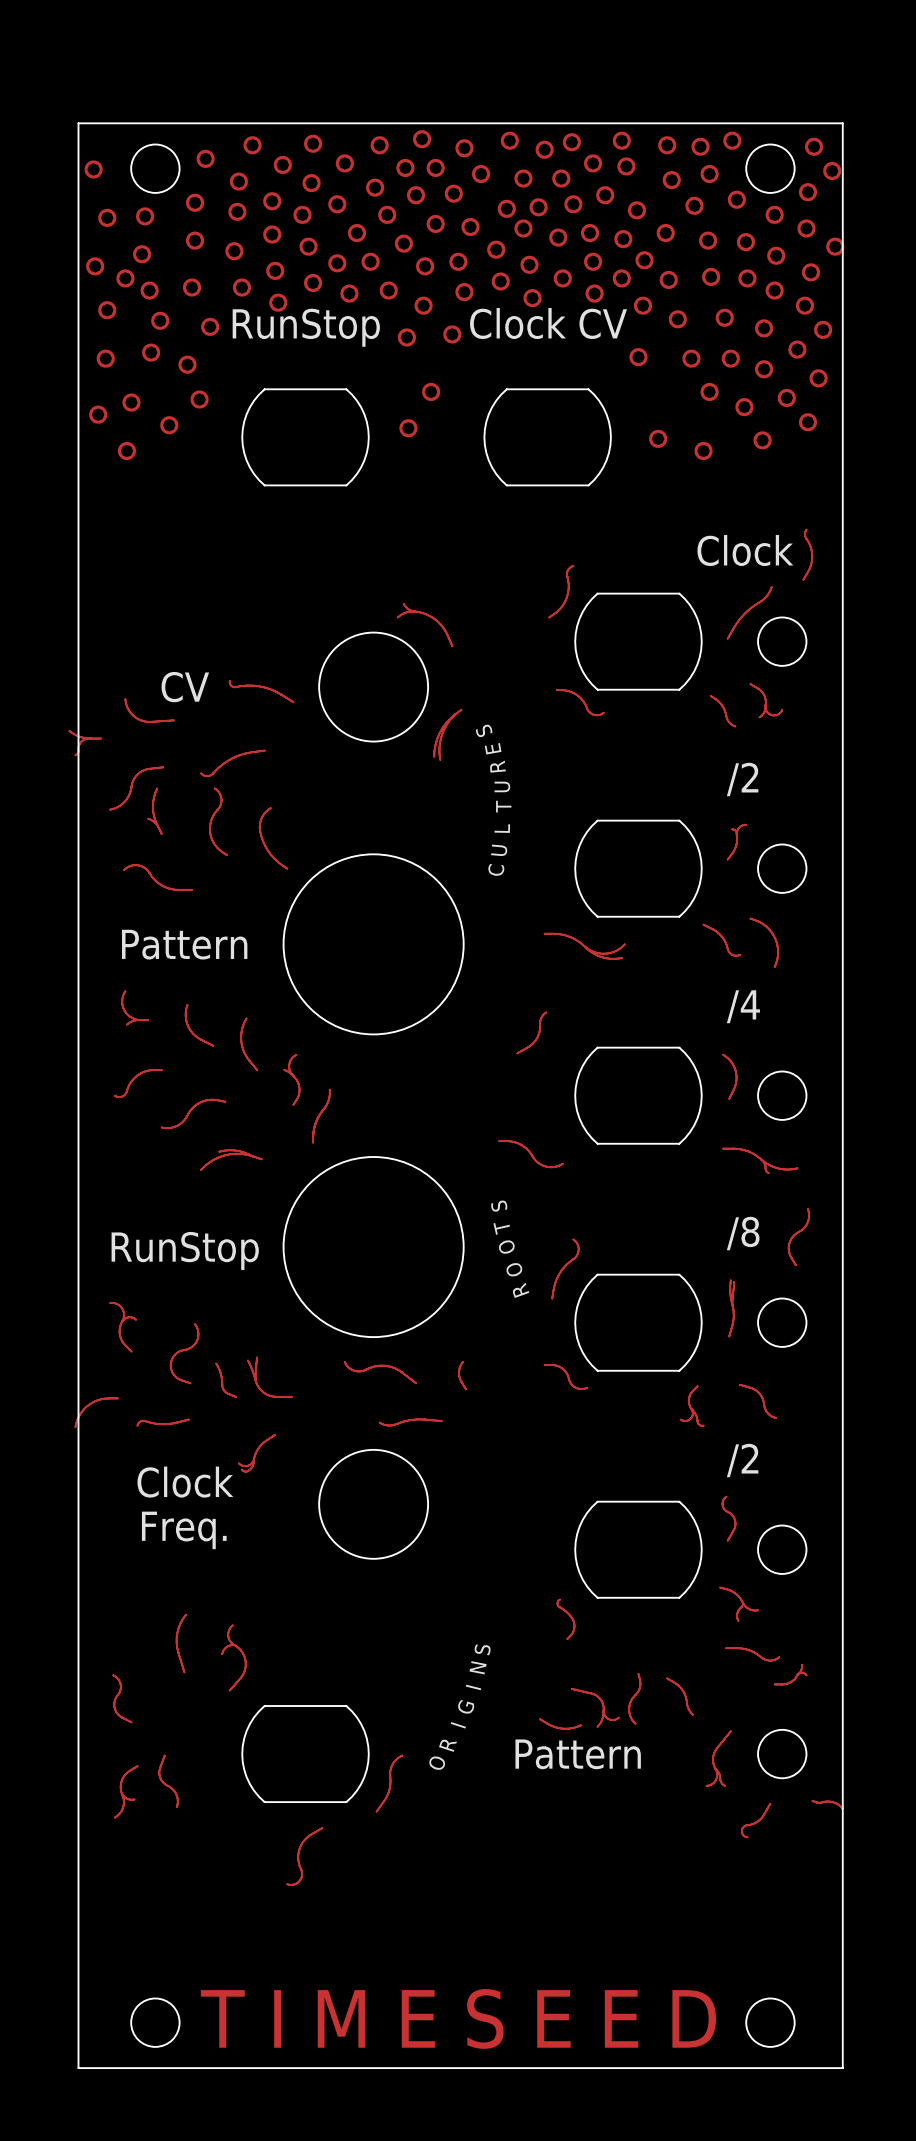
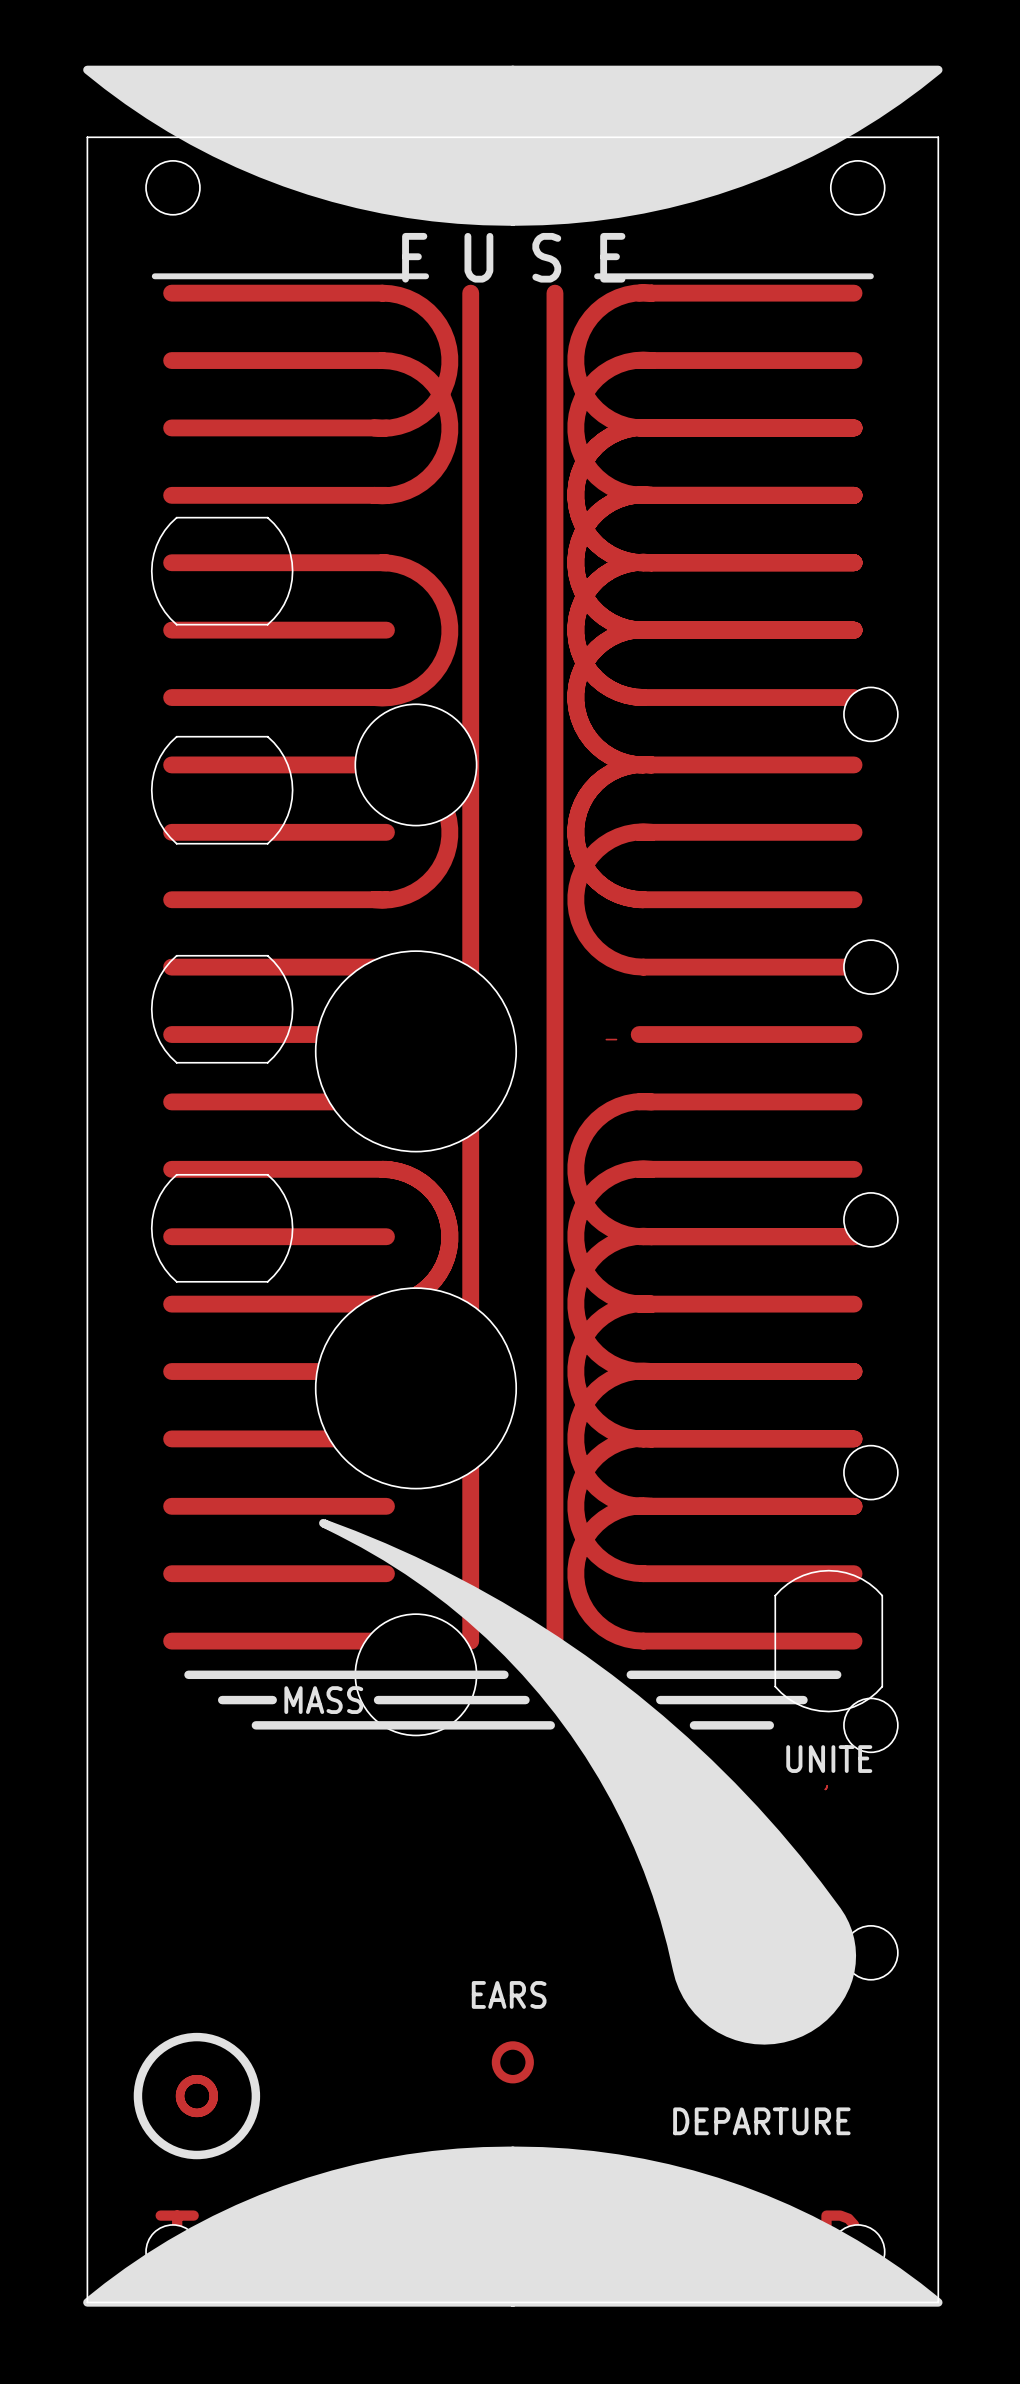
drawing: none -> [83, 65, 943, 226]
drawing: [196, 130, 746, 347] -> none
drawing: [682, 137, 845, 450] -> none
drawing: [84, 160, 103, 179] -> none
drawing: [185, 193, 205, 212] -> none
drawing: [136, 207, 155, 226] -> none
drawing: [98, 208, 117, 227] -> none
drawing: [185, 231, 205, 250] -> none
text: none -> F U S E (513, 257)
drawing: [225, 242, 244, 261] -> none
drawing: [86, 245, 170, 362] -> none
line: none -> (154, 276) (426, 276)
line: none -> (597, 276) (870, 276)
track: none -> (171, 293) (382, 293) (407, 297) (422, 306) (434, 317) (446, 339) (449, 365) (446, 381) (434, 403) (414, 420) (399, 426) (373, 427)
track: none -> (470, 293) (470, 1641)
track: none -> (554, 293) (554, 1641)
track: none -> (639, 293) (854, 293)
track: none -> (651, 293) (634, 293) (618, 297) (597, 310) (582, 331) (575, 356) (579, 381) (591, 403) (603, 415) (618, 423) (643, 427)
drawing: [182, 278, 202, 297] -> none
drawing: [715, 308, 734, 327] -> none
drawing: [201, 317, 220, 336] -> none
track: none -> (171, 360) (382, 360) (407, 365) (422, 373) (434, 385) (446, 407) (449, 432) (446, 449) (434, 471) (414, 487) (399, 493) (373, 495)
text: Clock CV (548, 323) -> none
track: none -> (639, 360) (854, 360)
track: none -> (651, 360) (634, 360) (618, 364) (597, 378) (582, 398) (575, 423) (579, 448) (591, 470) (603, 482) (618, 490) (643, 495)
text: RunStop (306, 327) -> none
drawing: [629, 348, 648, 367] -> none
drawing: [96, 349, 115, 368] -> none
drawing: [160, 355, 209, 435] -> none
drawing: [422, 382, 441, 402] -> none
track: none -> (171, 427) (386, 427)
track: none -> (639, 427) (854, 427)
track: none -> (651, 427) (634, 427) (618, 432) (597, 445) (582, 466) (575, 490) (579, 516) (591, 538) (610, 554) (634, 562) (643, 562) (634, 562) (626, 560) (618, 557) (610, 554) (603, 549) (591, 538) (582, 523) (579, 516) (576, 507) (575, 490) (579, 474) (582, 466) (586, 458) (597, 445) (603, 440) (618, 432) (626, 429) (634, 427) (643, 427) (651, 427)
drawing: [484, 389, 611, 486] -> none
drawing: [89, 393, 141, 424] -> none
drawing: [399, 419, 418, 438] -> none
drawing: [649, 429, 668, 448] -> none
drawing position: (305, 437) -> (222, 571)
drawing: [117, 441, 137, 461] -> none
drawing: [694, 441, 713, 461] -> none
track: none -> (171, 495) (386, 495)
track: none -> (639, 495) (854, 495)
track: none -> (651, 495) (634, 495) (618, 499) (597, 513) (582, 533) (575, 558) (579, 583) (591, 605) (610, 621) (634, 629) (643, 630) (634, 629) (626, 628) (618, 625) (610, 621) (603, 617) (591, 605) (582, 591) (579, 583) (576, 575) (575, 558) (579, 541) (582, 533) (586, 526) (597, 513) (603, 507) (618, 499) (626, 496) (634, 495) (643, 494) (651, 495)
track: none -> (171, 562) (386, 562)
track: none -> (382, 562) (407, 567) (422, 575) (434, 587) (446, 609) (449, 634) (443, 659) (428, 679) (407, 693) (390, 697) (373, 697)
track: none -> (639, 562) (854, 562)
track: none -> (651, 562) (634, 562) (618, 566) (597, 580) (582, 601) (575, 625) (579, 650) (591, 673) (610, 689) (634, 697) (643, 697) (634, 697) (626, 695) (618, 692) (610, 689) (603, 684) (591, 673) (582, 658) (579, 650) (576, 642) (575, 625) (579, 608) (582, 601) (586, 593) (597, 580) (603, 575) (618, 566) (626, 564) (634, 562) (643, 562) (651, 562)
track: (806, 538) (812, 555) (807, 572) -> none
track: (806, 538) (804, 534) (806, 529) (805, 532) (804, 534) (805, 536) (806, 538) -> none
track: (806, 538) (812, 555) (807, 572) -> none
text: Clock (745, 550) -> none
track: none -> (171, 630) (386, 630)
track: none -> (639, 630) (854, 630)
track: none -> (651, 630) (634, 630) (618, 634) (597, 647) (582, 668) (575, 693) (579, 718) (591, 740) (610, 756) (634, 764) (643, 764) (634, 764) (626, 762) (618, 760) (610, 756) (603, 752) (591, 740) (582, 726) (579, 718) (576, 709) (575, 693) (579, 676) (582, 668) (586, 661) (597, 647) (603, 642) (618, 634) (626, 631) (634, 630) (643, 629) (651, 630)
track: (807, 572) (803, 579) -> none
track: (567, 576) (568, 585) (566, 597) (562, 605) (553, 614) -> none
track: (567, 576) (568, 569) (573, 566) (570, 567) (568, 569) (567, 572) (567, 576) -> none
track: (567, 576) (568, 585) (566, 597) (562, 605) (553, 614) -> none
drawing: [575, 593, 702, 690] -> none
track: (759, 602) (744, 613) (733, 628) -> none
track: (759, 602) (767, 595) (771, 587) (768, 593) (767, 595) (762, 600) (759, 602) -> none
track: (759, 602) (744, 613) (733, 628) -> none
track: (412, 611) (404, 612) (397, 617) (399, 615) (404, 612) (410, 611) (412, 611) -> none
track: (414, 611) (434, 618) (447, 635) -> none
track: (414, 611) (408, 609) (403, 603) (405, 606) (408, 609) (410, 610) (414, 611) -> none
track: (414, 611) (434, 618) (447, 635) -> none
track: (553, 614) (549, 617) -> none
track: none -> (171, 697) (386, 697)
track: none -> (639, 697) (854, 697)
track: (733, 628) (727, 638) -> none
track: (447, 635) (452, 646) -> none
drawing: none -> [151, 736, 293, 844]
track: none -> (171, 764) (386, 764)
text: CV (185, 687) -> none
track: (235, 687) (259, 686) (281, 694) -> none
track: (235, 687) (231, 685) (229, 681) (229, 683) (231, 685) (233, 687) (235, 687) -> none
track: (235, 687) (259, 686) (281, 694) -> none
track: none -> (382, 764) (407, 769) (422, 777) (434, 789) (446, 811) (449, 836) (443, 861) (428, 881) (407, 895) (390, 899) (373, 899)
track: none -> (639, 764) (854, 764)
track: none -> (651, 764) (634, 764) (618, 769) (597, 782) (582, 803) (575, 827) (579, 852) (591, 875) (610, 891) (634, 899) (643, 899) (634, 899) (626, 897) (618, 894) (610, 891) (603, 886) (591, 875) (582, 860) (579, 852) (576, 844) (575, 827) (579, 811) (582, 803) (586, 795) (597, 782) (603, 777) (618, 769) (626, 766) (634, 764) (643, 764) (651, 764)
track: (281, 694) (293, 702) -> none
track: (711, 696) (715, 699) -> none
track: (715, 699) (722, 706) (726, 715) -> none
track: (715, 699) (722, 706) (726, 715) -> none
track: (765, 705) (764, 695) (758, 688) (761, 690) (764, 695) (765, 701) (765, 705) -> none
track: (765, 705) (766, 711) (771, 715) (778, 714) (782, 709) (780, 712) (778, 714) (775, 715) (771, 715) (768, 713) (766, 711) (765, 708) (765, 705) -> none
track: (765, 706) (763, 712) (759, 717) (762, 715) (763, 712) (765, 709) (765, 706) -> none
track: (587, 708) (577, 695) (561, 690) (571, 691) (577, 695) (581, 699) (587, 708) -> none
track: (587, 708) (594, 714) (603, 712) (599, 715) (594, 714) (589, 712) (587, 708) -> none
track: (461, 709) (455, 714) -> none
track: (455, 714) (439, 733) (434, 756) (435, 744) (439, 733) (446, 722) (455, 714) -> none
track: (453, 715) (441, 736) (440, 759) (439, 747) (441, 736) (446, 725) (453, 715) -> none
track: (726, 715) (729, 722) (735, 726) (732, 725) (729, 722) (727, 718) (726, 715) -> none
track: (173, 720) (151, 721) -> none
track: (151, 721) (140, 720) (133, 715) (127, 707) (125, 699) (126, 704) (127, 707) (129, 711) (133, 715) (135, 717) (140, 720) (145, 721) (151, 721) -> none
track: (69, 730) (79, 736) (90, 738) (83, 737) (79, 736) (72, 733) (69, 730) -> none
text: S (484, 730) -> none
track: (89, 738) (101, 738) -> none
track: (89, 738) (81, 742) (78, 750) -> none
track: (89, 738) (81, 742) (78, 750) -> none
track: none -> (171, 832) (386, 832)
track: none -> (639, 832) (854, 832)
track: none -> (651, 832) (626, 833) (610, 840) (591, 856) (579, 878) (575, 895) (579, 920) (591, 942) (603, 954) (618, 962) (643, 967) (854, 967)
text: E (493, 748) -> none
track: (78, 750) (77, 753) (75, 755) (76, 754) (77, 753) (78, 752) (78, 750) -> none
text: R (497, 766) -> none
track: (163, 767) (149, 768) -> none
track: (149, 768) (137, 774) (131, 786) -> none
track: (149, 768) (137, 774) (131, 786) -> none
track: (213, 773) (230, 759) (252, 752) (245, 753) (230, 759) (224, 763) (213, 773) -> none
track: (213, 773) (207, 776) (201, 773) (204, 775) (207, 776) (210, 775) (213, 773) -> none
text: /2 (742, 779) -> none
track: (131, 786) (124, 801) (110, 809) (116, 807) (124, 801) (128, 796) (131, 786) -> none
text: U (502, 786) -> none
text: T (503, 806) -> none
track: none -> (171, 899) (386, 899)
track: none -> (639, 899) (854, 899)
track: (217, 809) (212, 818) (210, 831) (214, 844) (222, 852) -> none
track: (217, 809) (221, 798) (214, 788) (219, 793) (221, 798) (221, 803) (217, 809) -> none
track: (217, 809) (212, 818) (210, 831) (214, 844) (222, 852) -> none
drawing: [575, 820, 702, 917] -> none
track: (155, 823) (152, 820) (148, 818) (150, 819) (152, 820) (154, 821) (155, 823) -> none
track: (157, 824) (161, 833) -> none
track: (157, 824) (152, 806) (157, 788) (153, 797) (152, 806) (153, 815) (157, 824) -> none
text: L (502, 828) -> none
track: (260, 830) (267, 850) (282, 865) (274, 858) (267, 850) (263, 841) (260, 830) -> none
track: (260, 830) (261, 817) (270, 808) (266, 811) (261, 817) (259, 825) (260, 830) -> none
track: (736, 833) (735, 830) (732, 829) (734, 829) (735, 830) (736, 832) (736, 833) -> none
track: (736, 835) (736, 844) (732, 853) -> none
track: (736, 835) (738, 828) (745, 824) (742, 825) (738, 828) (737, 830) (736, 835) -> none
track: (736, 835) (736, 844) (732, 853) -> none
text: U (499, 850) -> none
track: (222, 852) (226, 855) -> none
track: (732, 853) (727, 859) -> none
drawing: none -> [151, 955, 293, 1063]
track: none -> (171, 967) (382, 967) (407, 971) (422, 980) (439, 998) (446, 1013) (449, 1039) (443, 1063) (428, 1084) (414, 1094) (399, 1100) (373, 1101)
text: C (496, 870) -> none
track: (149, 873) (161, 885) (178, 889) -> none
track: (149, 873) (144, 867) (137, 865) (130, 866) (123, 870) (126, 867) (130, 866) (133, 865) (137, 865) (141, 866) (144, 867) (147, 870) (149, 873) -> none
track: (149, 873) (161, 885) (178, 889) -> none
track: (178, 889) (192, 889) -> none
track: (750, 918) (755, 920) -> none
track: (755, 920) (768, 928) (775, 939) (777, 955) (774, 967) (776, 963) (777, 955) (777, 947) (775, 939) (773, 935) (768, 928) (762, 923) (755, 920) -> none
track: none -> (171, 1034) (386, 1034)
track: none -> (639, 1034) (854, 1034)
text: Pattern (184, 944) -> none
track: (583, 945) (570, 936) (553, 933) (564, 935) (570, 936) (579, 942) (583, 945) -> none
track: (583, 945) (595, 952) (604, 953) (614, 951) (624, 944) (619, 948) (614, 951) (607, 953) (604, 953) (601, 953) (595, 952) (589, 949) (583, 945) -> none
track: (585, 947) (602, 957) (621, 957) (612, 958) (602, 957) (593, 953) (585, 947) -> none
track: (727, 948) (722, 937) (712, 929) (718, 932) (722, 937) (725, 942) (727, 948) -> none
track: (727, 948) (732, 954) (739, 954) (736, 955) (732, 954) (729, 951) (727, 948) -> none
track: none -> (171, 1101) (386, 1101)
track: none -> (639, 1101) (854, 1101)
track: none -> (651, 1101) (634, 1101) (618, 1106) (597, 1119) (582, 1140) (575, 1164) (579, 1189) (591, 1212) (610, 1228) (626, 1234) (643, 1236)
track: (125, 991) (122, 999) (124, 1010) (132, 1017) (140, 1020) (136, 1019) (132, 1017) (126, 1013) (124, 1010) (122, 1003) (122, 999) (123, 995) (125, 991) -> none
text: /4 (743, 1006) -> none
track: (139, 1020) (148, 1020) -> none
track: (139, 1020) (132, 1021) (126, 1024) (130, 1022) (132, 1021) (136, 1020) (139, 1020) -> none
track: (540, 1024) (537, 1037) (527, 1047) -> none
track: (540, 1024) (541, 1017) (546, 1012) (543, 1014) (541, 1017) (540, 1021) (540, 1024) -> none
track: (540, 1024) (537, 1037) (527, 1047) -> none
track: (201, 1039) (213, 1045) -> none
track: (201, 1039) (192, 1033) (187, 1024) (185, 1014) (187, 1004) (186, 1008) (185, 1014) (185, 1018) (187, 1024) (189, 1028) (192, 1033) (195, 1035) (201, 1039) -> none
track: (527, 1047) (517, 1053) -> none
drawing: [575, 1047, 702, 1144] -> none
track: none -> (171, 1169) (386, 1169)
track: none -> (382, 1169) (399, 1171) (414, 1177) (434, 1193) (446, 1216) (449, 1241) (443, 1265) (428, 1286) (407, 1299) (382, 1304) (373, 1304) (382, 1304) (390, 1304) (407, 1299) (414, 1296) (428, 1286) (439, 1273) (443, 1265) (446, 1257) (449, 1241) (449, 1232) (446, 1216) (439, 1200) (434, 1193) (422, 1182) (414, 1177) (407, 1174) (399, 1171) (390, 1169) (382, 1169)
track: none -> (639, 1169) (854, 1169)
track: none -> (651, 1169) (634, 1169) (618, 1173) (597, 1187) (582, 1207) (575, 1232) (579, 1257) (591, 1279) (610, 1295) (626, 1301) (643, 1304)
drawing: none -> [151, 1174, 293, 1282]
track: (249, 1060) (257, 1069) -> none
track: (249, 1060) (242, 1049) (241, 1040) (242, 1026) (246, 1018) (244, 1022) (242, 1026) (241, 1035) (241, 1040) (241, 1044) (242, 1049) (244, 1053) (249, 1060) -> none
track: (154, 1069) (161, 1069) -> none
track: (154, 1069) (145, 1071) (136, 1075) (130, 1082) (126, 1091) -> none
track: (154, 1069) (145, 1071) (136, 1075) (130, 1082) (126, 1091) -> none
track: (291, 1074) (288, 1071) (284, 1069) (286, 1070) (288, 1071) (290, 1073) (291, 1074) -> none
track: (293, 1076) (299, 1087) (296, 1100) -> none
track: (293, 1076) (289, 1070) (289, 1064) (291, 1058) (296, 1054) (293, 1056) (291, 1058) (290, 1061) (289, 1064) (289, 1067) (289, 1070) (291, 1073) (293, 1076) -> none
track: (293, 1076) (299, 1087) (296, 1100) -> none
track: (733, 1089) (729, 1098) -> none
track: (733, 1089) (736, 1080) (735, 1070) (730, 1061) (723, 1054) (728, 1058) (730, 1061) (734, 1067) (735, 1070) (736, 1073) (736, 1080) (735, 1086) (733, 1089) -> none
track: (126, 1091) (122, 1096) (114, 1095) (118, 1097) (122, 1096) (125, 1094) (126, 1091) -> none
track: (217, 1100) (225, 1101) -> none
track: (217, 1100) (200, 1102) (187, 1115) -> none
track: (217, 1100) (200, 1102) (187, 1115) -> none
track: (296, 1100) (293, 1104) -> none
track: (323, 1109) (315, 1122) (313, 1138) -> none
track: (323, 1109) (315, 1122) (313, 1138) -> none
track: (323, 1109) (328, 1100) (329, 1089) (329, 1094) (328, 1100) (326, 1104) (323, 1109) -> none
track: (323, 1109) (315, 1122) (313, 1138) -> none
track: none -> (171, 1236) (386, 1236)
track: none -> (639, 1236) (854, 1236)
track: none -> (651, 1236) (634, 1236) (618, 1240) (597, 1254) (582, 1275) (575, 1299) (579, 1324) (591, 1346) (610, 1363) (626, 1369) (643, 1371)
track: (187, 1115) (176, 1126) (161, 1127) (169, 1128) (176, 1126) (183, 1121) (187, 1115) -> none
track: (313, 1138) (313, 1142) -> none
track: (499, 1141) (506, 1141) -> none
track: (506, 1141) (521, 1145) (532, 1156) (528, 1151) (521, 1145) (516, 1142) (506, 1141) -> none
track: (723, 1148) (733, 1148) -> none
track: (733, 1148) (748, 1151) (761, 1159) -> none
track: (733, 1148) (748, 1151) (761, 1159) -> none
track: (249, 1154) (234, 1150) (219, 1151) (229, 1150) (234, 1150) (239, 1151) (249, 1154) -> none
track: (252, 1156) (261, 1159) -> none
track: (252, 1156) (235, 1153) (224, 1155) (209, 1162) (201, 1169) (205, 1165) (209, 1162) (219, 1157) (224, 1155) (230, 1154) (235, 1153) (247, 1154) (252, 1156) -> none
track: (761, 1159) (778, 1168) (797, 1168) (787, 1169) (778, 1168) (769, 1164) (761, 1159) -> none
track: (762, 1160) (764, 1164) (765, 1168) (765, 1166) (764, 1164) (763, 1162) (762, 1160) -> none
track: none -> (171, 1304) (386, 1304)
track: none -> (639, 1304) (854, 1304)
track: none -> (651, 1304) (634, 1304) (618, 1308) (597, 1321) (582, 1342) (575, 1367) (579, 1392) (591, 1414) (610, 1430) (626, 1436) (643, 1438)
text: S (499, 1206) -> none
text: T (501, 1228) -> none
track: none -> (171, 1371) (386, 1371)
track: none -> (639, 1371) (854, 1371)
track: none -> (651, 1371) (634, 1371) (618, 1375) (597, 1389) (582, 1409) (575, 1434) (579, 1459) (591, 1481) (610, 1497) (626, 1504) (643, 1506)
track: (798, 1231) (793, 1235) (789, 1243) (789, 1251) (791, 1257) -> none
track: (798, 1231) (807, 1222) (807, 1209) (809, 1215) (807, 1222) (804, 1227) (798, 1231) -> none
track: (798, 1231) (793, 1235) (789, 1243) (789, 1251) (791, 1257) -> none
text: /8 (743, 1233) -> none
text: O (506, 1247) -> none
text: RunStop (185, 1250) -> none
track: (791, 1257) (795, 1265) -> none
track: (573, 1259) (560, 1272) (553, 1289) (556, 1280) (560, 1272) (566, 1265) (573, 1259) -> none
track: (573, 1259) (578, 1249) (573, 1239) (577, 1243) (578, 1249) (577, 1254) (573, 1259) -> none
text: O (514, 1269) -> none
drawing: [575, 1274, 702, 1371] -> none
track: (733, 1287) (732, 1303) -> none
track: (733, 1287) (734, 1284) (733, 1281) (734, 1283) (734, 1284) (734, 1286) (733, 1287) -> none
track: (733, 1287) (732, 1303) -> none
text: R (520, 1290) -> none
track: none -> (171, 1438) (386, 1438)
track: none -> (639, 1438) (854, 1438)
track: none -> (651, 1438) (626, 1440) (610, 1446) (597, 1456) (582, 1477) (575, 1501) (579, 1526) (586, 1542) (603, 1560) (626, 1571) (643, 1573) (854, 1573)
track: (732, 1304) (732, 1325) -> none
track: (732, 1304) (730, 1292) (730, 1280) (730, 1286) (730, 1292) (730, 1298) (732, 1304) -> none
track: (732, 1304) (732, 1325) -> none
track: (123, 1319) (129, 1317) (136, 1319) (133, 1317) (129, 1317) (126, 1317) (123, 1319) -> none
track: (122, 1321) (119, 1333) (125, 1345) -> none
track: (122, 1321) (124, 1315) (122, 1308) (117, 1304) (110, 1303) (113, 1303) (117, 1304) (120, 1306) (122, 1308) (123, 1312) (124, 1315) (123, 1318) (122, 1321) -> none
track: (122, 1321) (119, 1333) (125, 1345) -> none
track: (732, 1325) (729, 1336) -> none
track: (125, 1345) (131, 1351) -> none
track: (184, 1349) (175, 1353) (170, 1363) (172, 1373) (181, 1380) -> none
track: (184, 1349) (191, 1347) (197, 1340) (198, 1332) (195, 1324) (197, 1329) (198, 1332) (198, 1336) (197, 1340) (194, 1344) (191, 1347) (188, 1349) (184, 1349) -> none
track: (184, 1349) (175, 1353) (170, 1363) (172, 1373) (181, 1380) -> none
track: none -> (171, 1506) (386, 1506)
track: none -> (639, 1506) (854, 1506)
track: none -> (651, 1506) (626, 1507) (610, 1514) (597, 1524) (582, 1544) (575, 1569) (579, 1594) (586, 1609) (603, 1628) (626, 1638) (643, 1641) (854, 1641)
drawing: none -> [319, 1518, 883, 2084]
track: (544, 1365) (552, 1365) -> none
track: (552, 1365) (562, 1368) (568, 1378) -> none
track: (552, 1365) (562, 1368) (568, 1378) -> none
track: (366, 1369) (384, 1365) (402, 1372) -> none
track: (366, 1369) (353, 1370) (344, 1362) (349, 1367) (353, 1370) (360, 1371) (366, 1369) -> none
track: (366, 1369) (384, 1365) (402, 1372) -> none
track: (402, 1372) (415, 1383) -> none
track: (255, 1378) (255, 1368) (257, 1357) (255, 1368) (255, 1378) -> none
track: (568, 1378) (575, 1387) (587, 1387) (580, 1389) (575, 1387) (571, 1384) (568, 1378) -> none
track: (181, 1380) (190, 1383) -> none
track: (255, 1380) (263, 1392) (276, 1396) -> none
track: (255, 1380) (252, 1370) (248, 1360) (250, 1365) (252, 1370) (254, 1375) (255, 1380) -> none
track: (255, 1380) (263, 1392) (276, 1396) -> none
track: (461, 1381) (465, 1389) -> none
track: (461, 1381) (459, 1371) (462, 1362) (460, 1365) (459, 1371) (459, 1375) (461, 1381) -> none
track: (222, 1384) (223, 1390) (228, 1393) -> none
track: (222, 1384) (220, 1373) (216, 1363) (218, 1366) (220, 1373) (221, 1377) (222, 1384) -> none
track: (222, 1384) (223, 1390) (228, 1393) -> none
track: (739, 1384) (750, 1387) -> none
track: (697, 1386) (692, 1390) -> none
track: (750, 1387) (759, 1393) (764, 1404) -> none
track: (750, 1387) (759, 1393) (764, 1404) -> none
track: (692, 1390) (688, 1399) (691, 1408) -> none
track: (692, 1390) (688, 1399) (691, 1408) -> none
track: (228, 1393) (235, 1396) -> none
track: (276, 1396) (291, 1396) -> none
track: (108, 1398) (117, 1398) -> none
track: (108, 1398) (97, 1400) (86, 1406) (79, 1415) (75, 1427) (76, 1423) (79, 1415) (81, 1412) (86, 1406) (89, 1404) (97, 1400) (100, 1399) (108, 1398) -> none
track: (764, 1404) (767, 1413) (776, 1418) (772, 1416) (767, 1413) (765, 1410) (764, 1404) -> none
track: (691, 1408) (692, 1414) (690, 1418) (685, 1420) (680, 1419) (683, 1420) (685, 1420) (688, 1420) (690, 1418) (692, 1416) (692, 1414) (692, 1411) (691, 1408) -> none
track: none -> (171, 1573) (386, 1573)
track: (188, 1419) (176, 1422) -> none
track: (425, 1419) (441, 1421) -> none
track: (425, 1419) (410, 1420) (396, 1424) -> none
track: (425, 1419) (410, 1420) (396, 1424) -> none
track: (145, 1421) (160, 1424) (176, 1422) -> none
track: (145, 1421) (140, 1421) (137, 1425) (138, 1423) (140, 1421) (142, 1420) (145, 1421) -> none
track: (145, 1421) (160, 1424) (176, 1422) -> none
track: (697, 1421) (696, 1415) (692, 1410) (694, 1411) (696, 1415) (696, 1417) (697, 1421) -> none
track: (697, 1421) (699, 1424) (703, 1425) (701, 1425) (699, 1424) (698, 1423) (697, 1421) -> none
track: (396, 1424) (387, 1425) (379, 1422) (383, 1424) (387, 1425) (392, 1425) (396, 1424) -> none
track: (275, 1434) (266, 1440) -> none
track: (266, 1440) (258, 1448) (254, 1458) -> none
track: (266, 1440) (258, 1448) (254, 1458) -> none
track: (254, 1458) (247, 1465) (238, 1463) (243, 1465) (247, 1465) (251, 1463) (254, 1458) -> none
track: (254, 1460) (252, 1466) (248, 1471) (250, 1469) (252, 1466) (253, 1463) (254, 1460) -> none
text: /2 (742, 1460) -> none
track: none -> (171, 1641) (386, 1641)
text: Clock (185, 1482) -> none
drawing: [575, 1501, 702, 1598] -> none
line: none -> (188, 1674) (504, 1674)
line: none -> (630, 1674) (837, 1674)
track: (727, 1511) (734, 1519) (733, 1530) -> none
track: (727, 1511) (722, 1504) (726, 1496) (723, 1500) (722, 1504) (724, 1509) (727, 1511) -> none
track: (727, 1511) (734, 1519) (733, 1530) -> none
line: none -> (222, 1700) (272, 1700)
text: none -> MASS (323, 1700)
line: none -> (378, 1700) (525, 1700)
line: none -> (660, 1700) (803, 1700)
text: Freq. (184, 1530) -> none
track: (733, 1530) (727, 1540) -> none
line: none -> (255, 1725) (550, 1725)
line: none -> (693, 1725) (769, 1725)
text: none -> UNITE (829, 1759)
track: (720, 1587) (726, 1589) -> none
track: (726, 1589) (736, 1594) (742, 1602) -> none
track: (726, 1589) (736, 1594) (742, 1602) -> none
track: (742, 1602) (749, 1609) (758, 1610) (753, 1610) (749, 1609) (745, 1606) (742, 1602) -> none
track: (559, 1607) (571, 1617) -> none
track: (559, 1607) (557, 1603) (559, 1599) (557, 1601) (557, 1603) (557, 1605) (559, 1607) -> none
track: (559, 1607) (571, 1617) -> none
track: (741, 1607) (737, 1613) (738, 1620) (737, 1617) (737, 1613) (738, 1610) (741, 1607) -> none
track: (571, 1617) (574, 1627) (570, 1636) -> none
track: (571, 1617) (574, 1627) (570, 1636) -> none
track: (570, 1636) (567, 1639) -> none
track: (232, 1645) (225, 1647) (222, 1654) (223, 1650) (225, 1647) (229, 1645) (232, 1645) -> none
track: (234, 1645) (242, 1652) (245, 1660) (245, 1668) (240, 1678) -> none
track: (234, 1645) (228, 1635) (232, 1625) (229, 1629) (228, 1635) (230, 1641) (234, 1645) -> none
track: (234, 1645) (242, 1652) (245, 1660) (245, 1668) (240, 1678) -> none
track: (726, 1648) (736, 1648) -> none
track: (736, 1648) (749, 1650) (761, 1657) -> none
track: (736, 1648) (749, 1650) (761, 1657) -> none
text: S (482, 1649) -> none
track: (178, 1652) (184, 1672) -> none
track: (178, 1652) (177, 1632) (185, 1614) (180, 1623) (177, 1632) (176, 1642) (178, 1652) -> none
track: (761, 1657) (770, 1660) (779, 1657) (774, 1659) (770, 1660) (765, 1659) (761, 1657) -> none
text: N (478, 1667) -> none
track: (638, 1673) (639, 1679) -> none
track: (798, 1673) (801, 1669) (801, 1664) (801, 1667) (801, 1669) (800, 1671) (798, 1673) -> none
track: (797, 1675) (791, 1681) (782, 1684) -> none
track: (797, 1675) (801, 1672) (806, 1675) (804, 1673) (801, 1672) (799, 1673) (797, 1675) -> none
track: (797, 1675) (791, 1681) (782, 1684) -> none
track: (240, 1678) (229, 1690) -> none
track: (667, 1678) (674, 1682) -> none
track: (639, 1679) (639, 1688) (635, 1695) -> none
track: (639, 1679) (639, 1688) (635, 1695) -> none
track: (674, 1682) (683, 1691) (686, 1702) -> none
track: (674, 1682) (683, 1691) (686, 1702) -> none
track: (774, 1684) (782, 1684) -> none
text: I (473, 1687) -> none
track: (571, 1688) (591, 1693) -> none
track: (591, 1693) (600, 1699) (603, 1710) -> none
track: (591, 1693) (600, 1699) (603, 1710) -> none
track: (117, 1695) (114, 1707) (122, 1717) -> none
track: (117, 1695) (120, 1684) (113, 1675) (117, 1678) (120, 1684) (120, 1689) (117, 1695) -> none
track: (117, 1695) (114, 1707) (122, 1717) -> none
track: (635, 1695) (630, 1702) (629, 1709) (631, 1718) (635, 1723) (633, 1722) (631, 1718) (629, 1713) (629, 1709) (629, 1707) (630, 1702) (632, 1698) (635, 1695) -> none
track: (686, 1702) (688, 1709) (692, 1714) (691, 1713) (688, 1709) (687, 1707) (686, 1702) -> none
drawing: [242, 1706, 369, 1803] -> none
text: G (465, 1707) -> none
track: (603, 1710) (604, 1715) (608, 1719) (613, 1719) (618, 1717) (617, 1718) (613, 1719) (611, 1720) (608, 1719) (606, 1717) (604, 1715) (603, 1713) (603, 1710) -> none
track: (603, 1711) (602, 1719) (597, 1726) (600, 1722) (602, 1719) (602, 1717) (603, 1711) -> none
track: (122, 1717) (131, 1722) -> none
track: (540, 1719) (547, 1723) -> none
track: (547, 1723) (564, 1728) (580, 1725) (572, 1728) (564, 1728) (555, 1727) (547, 1723) -> none
text: I (458, 1725) -> none
track: (730, 1731) (717, 1748) -> none
text: R (447, 1745) -> none
track: (717, 1748) (713, 1758) (715, 1769) -> none
track: (717, 1748) (713, 1758) (715, 1769) -> none
text: Pattern (578, 1754) -> none
track: (164, 1755) (160, 1767) -> none
text: O (437, 1763) -> none
track: (137, 1766) (129, 1770) -> none
track: (160, 1767) (160, 1778) (167, 1785) -> none
track: (160, 1767) (160, 1778) (167, 1785) -> none
track: (715, 1769) (715, 1780) (706, 1785) (712, 1784) (715, 1780) (717, 1774) (715, 1769) -> none
track: (129, 1770) (121, 1781) (122, 1794) -> none
track: (129, 1770) (121, 1781) (122, 1794) -> none
track: (717, 1770) (720, 1778) -> none
track: (717, 1770) (720, 1778) -> none
track: (390, 1776) (389, 1789) (384, 1800) -> none
track: (390, 1776) (392, 1764) (402, 1755) (397, 1758) (392, 1764) (390, 1771) (390, 1776) -> none
track: (390, 1776) (389, 1789) (384, 1800) -> none
track: (720, 1778) (721, 1782) (724, 1785) (723, 1784) (721, 1782) (720, 1781) (720, 1778) -> none
track: (167, 1785) (176, 1794) (176, 1807) (177, 1800) (176, 1794) (172, 1789) (167, 1785) -> none
text: none -> EARS (509, 1994)
track: (122, 1794) (123, 1807) (114, 1817) (119, 1813) (123, 1807) (123, 1801) (122, 1794) -> none
track: (123, 1796) (128, 1799) (134, 1799) (131, 1799) (128, 1799) (126, 1798) (123, 1796) -> none
track: (384, 1800) (376, 1811) -> none
track: (812, 1800) (817, 1802) -> none
track: (817, 1802) (821, 1802) -> none
track: (817, 1802) (821, 1802) -> none
track: (821, 1802) (833, 1802) (842, 1808) (837, 1804) (833, 1802) (826, 1801) (821, 1802) -> none
track: (770, 1804) (764, 1814) -> none
track: (764, 1814) (757, 1821) (747, 1825) -> none
track: (764, 1814) (757, 1821) (747, 1825) -> none
drawing: none -> [83, 2032, 943, 2307]
track: (747, 1825) (743, 1827) (741, 1831) (743, 1835) (747, 1837) (745, 1836) (743, 1835) (742, 1833) (741, 1831) (742, 1829) (743, 1827) (745, 1825) (747, 1825) -> none
track: (322, 1828) (311, 1834) -> none
track: (311, 1834) (304, 1840) (299, 1849) (298, 1859) (300, 1869) -> none
track: (311, 1834) (304, 1840) (299, 1849) (298, 1859) (300, 1869) -> none
track: (300, 1869) (302, 1875) (299, 1881) (293, 1884) (287, 1884) (291, 1884) (293, 1884) (297, 1882) (299, 1881) (301, 1877) (302, 1875) (302, 1872) (300, 1869) -> none
text: none -> DEPARTURE (761, 2121)

